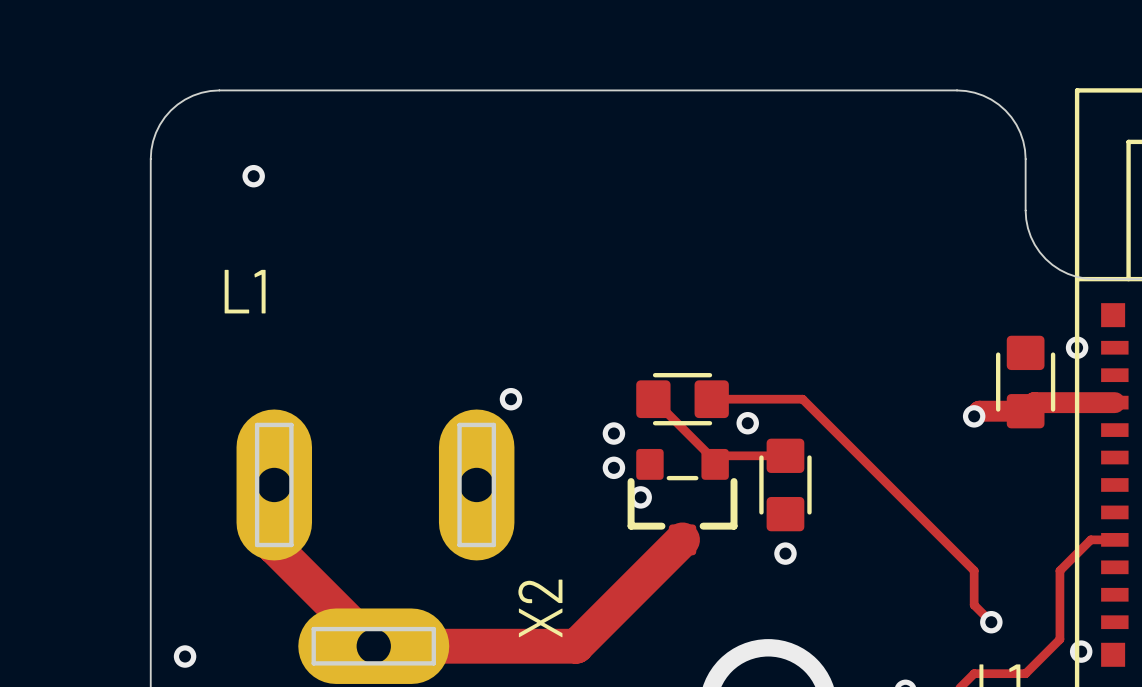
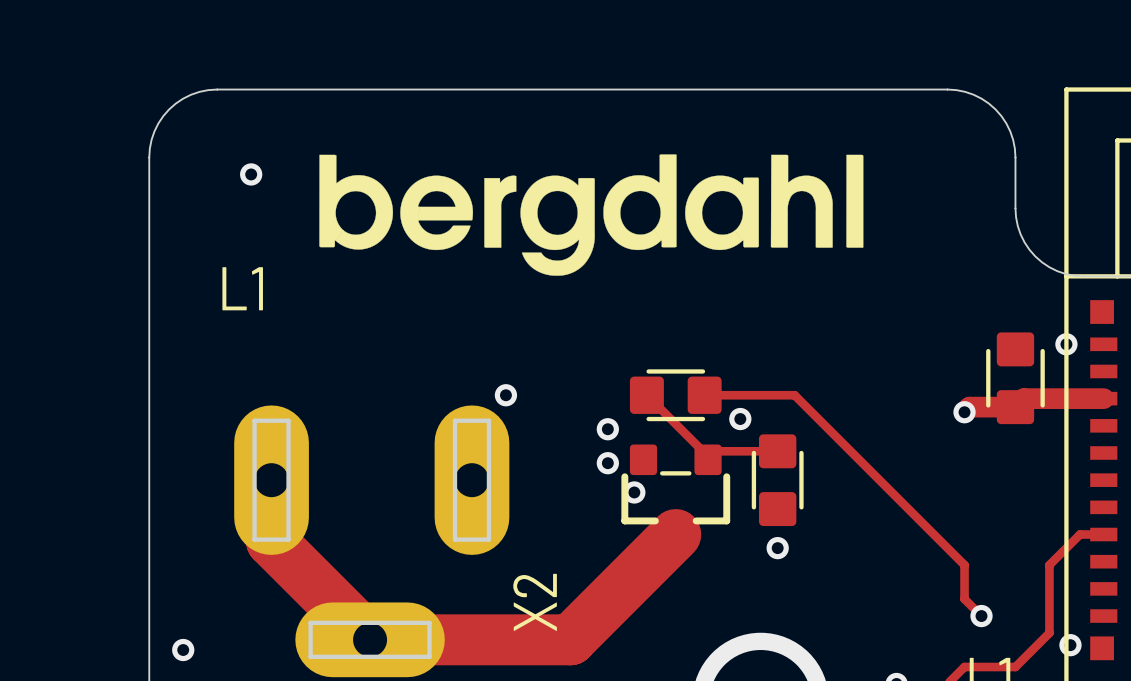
drawing: none -> [319, 154, 864, 276]
track width: thin (274, 484) (274, 546) (373, 646) (576, 646) (682, 539) -> thick (271, 480) (271, 541) (370, 639) (570, 639) (675, 534)

